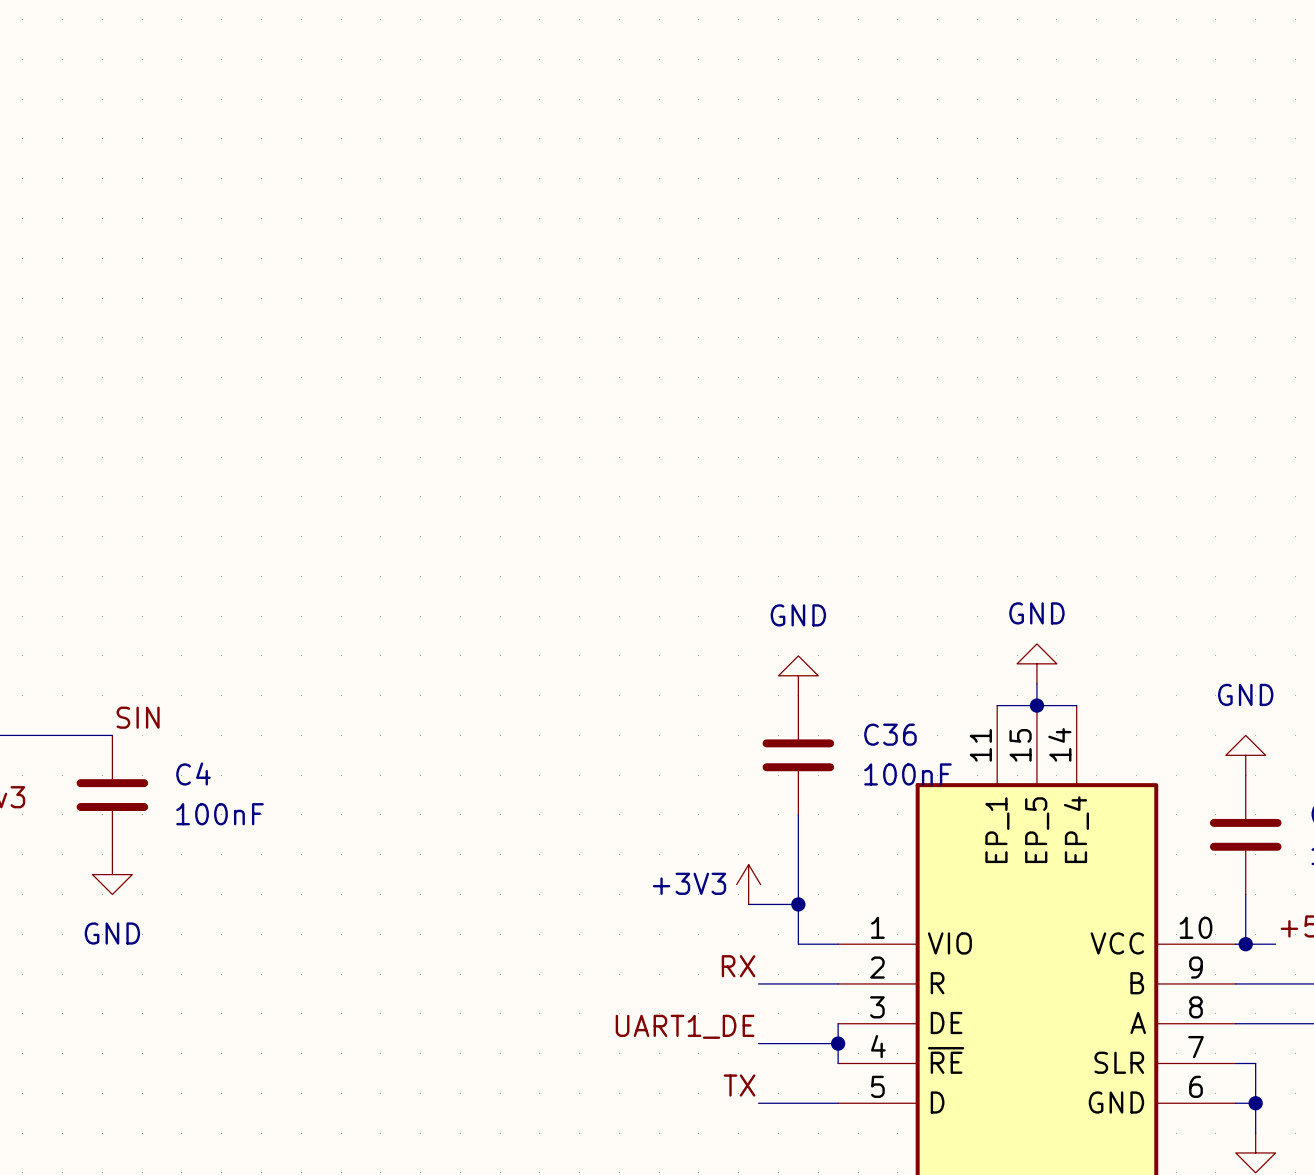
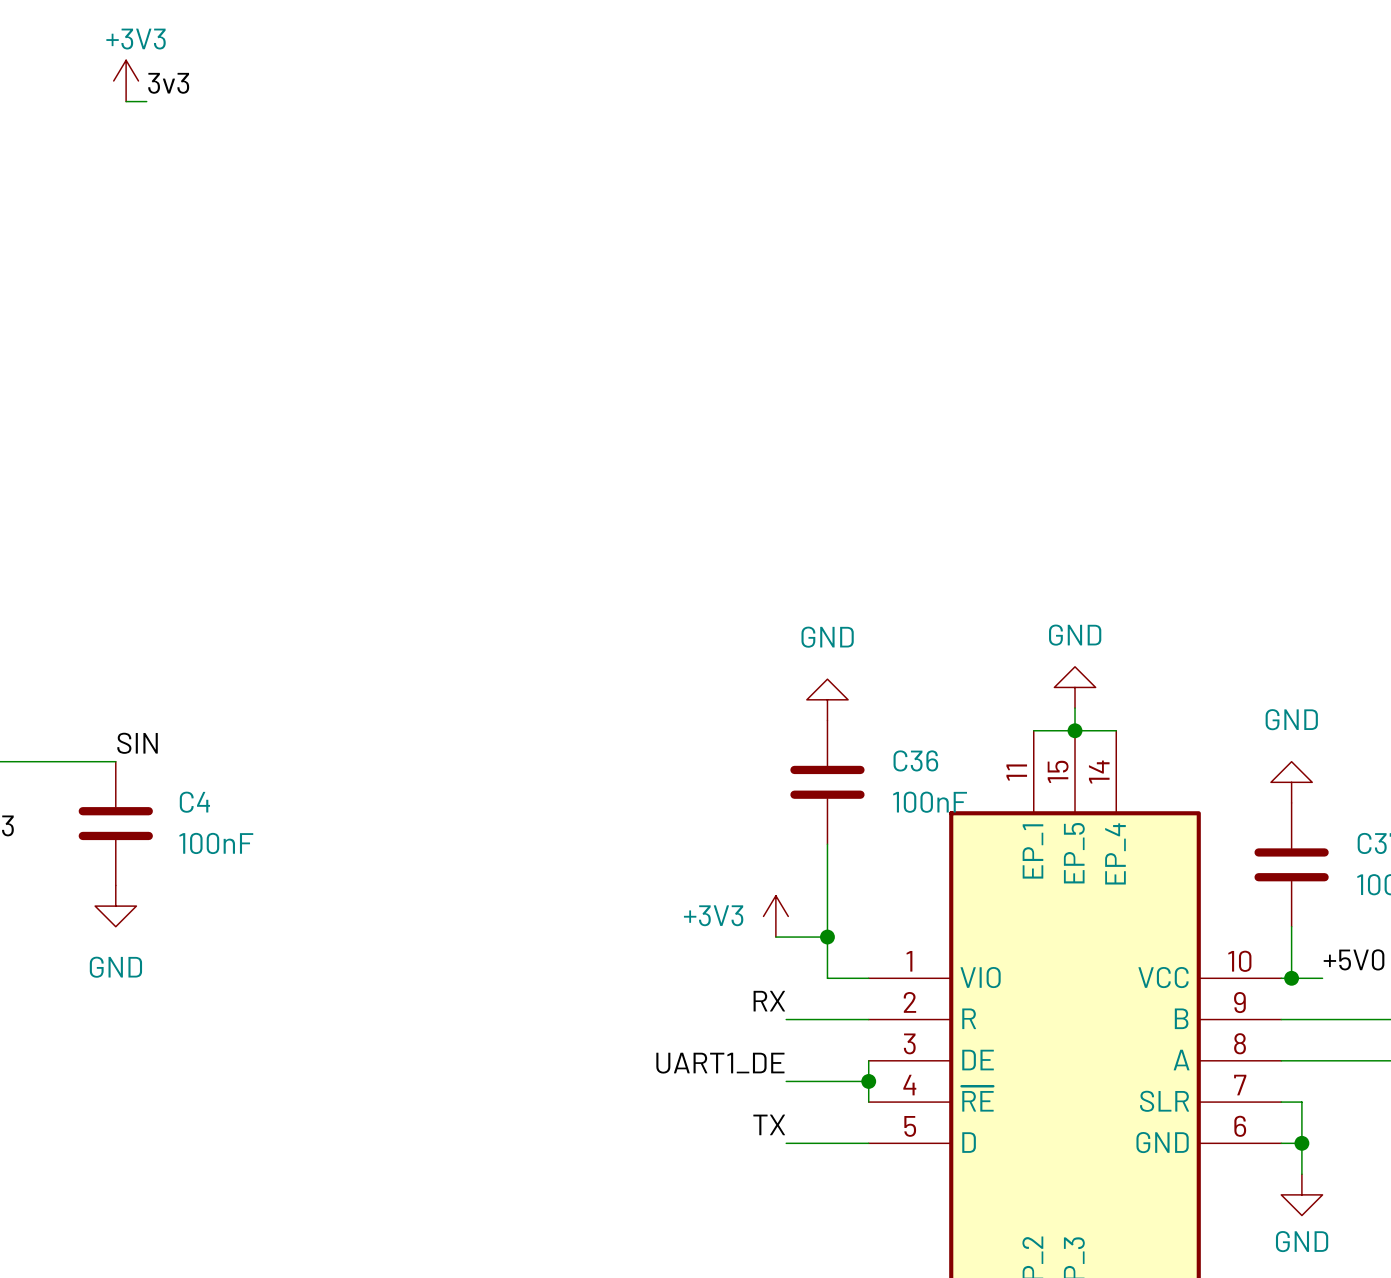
power symbol: none -> +3V3 (126, 80)
label: none -> 3v3 (168, 83)
wire: none -> (126, 101) (146, 101)

